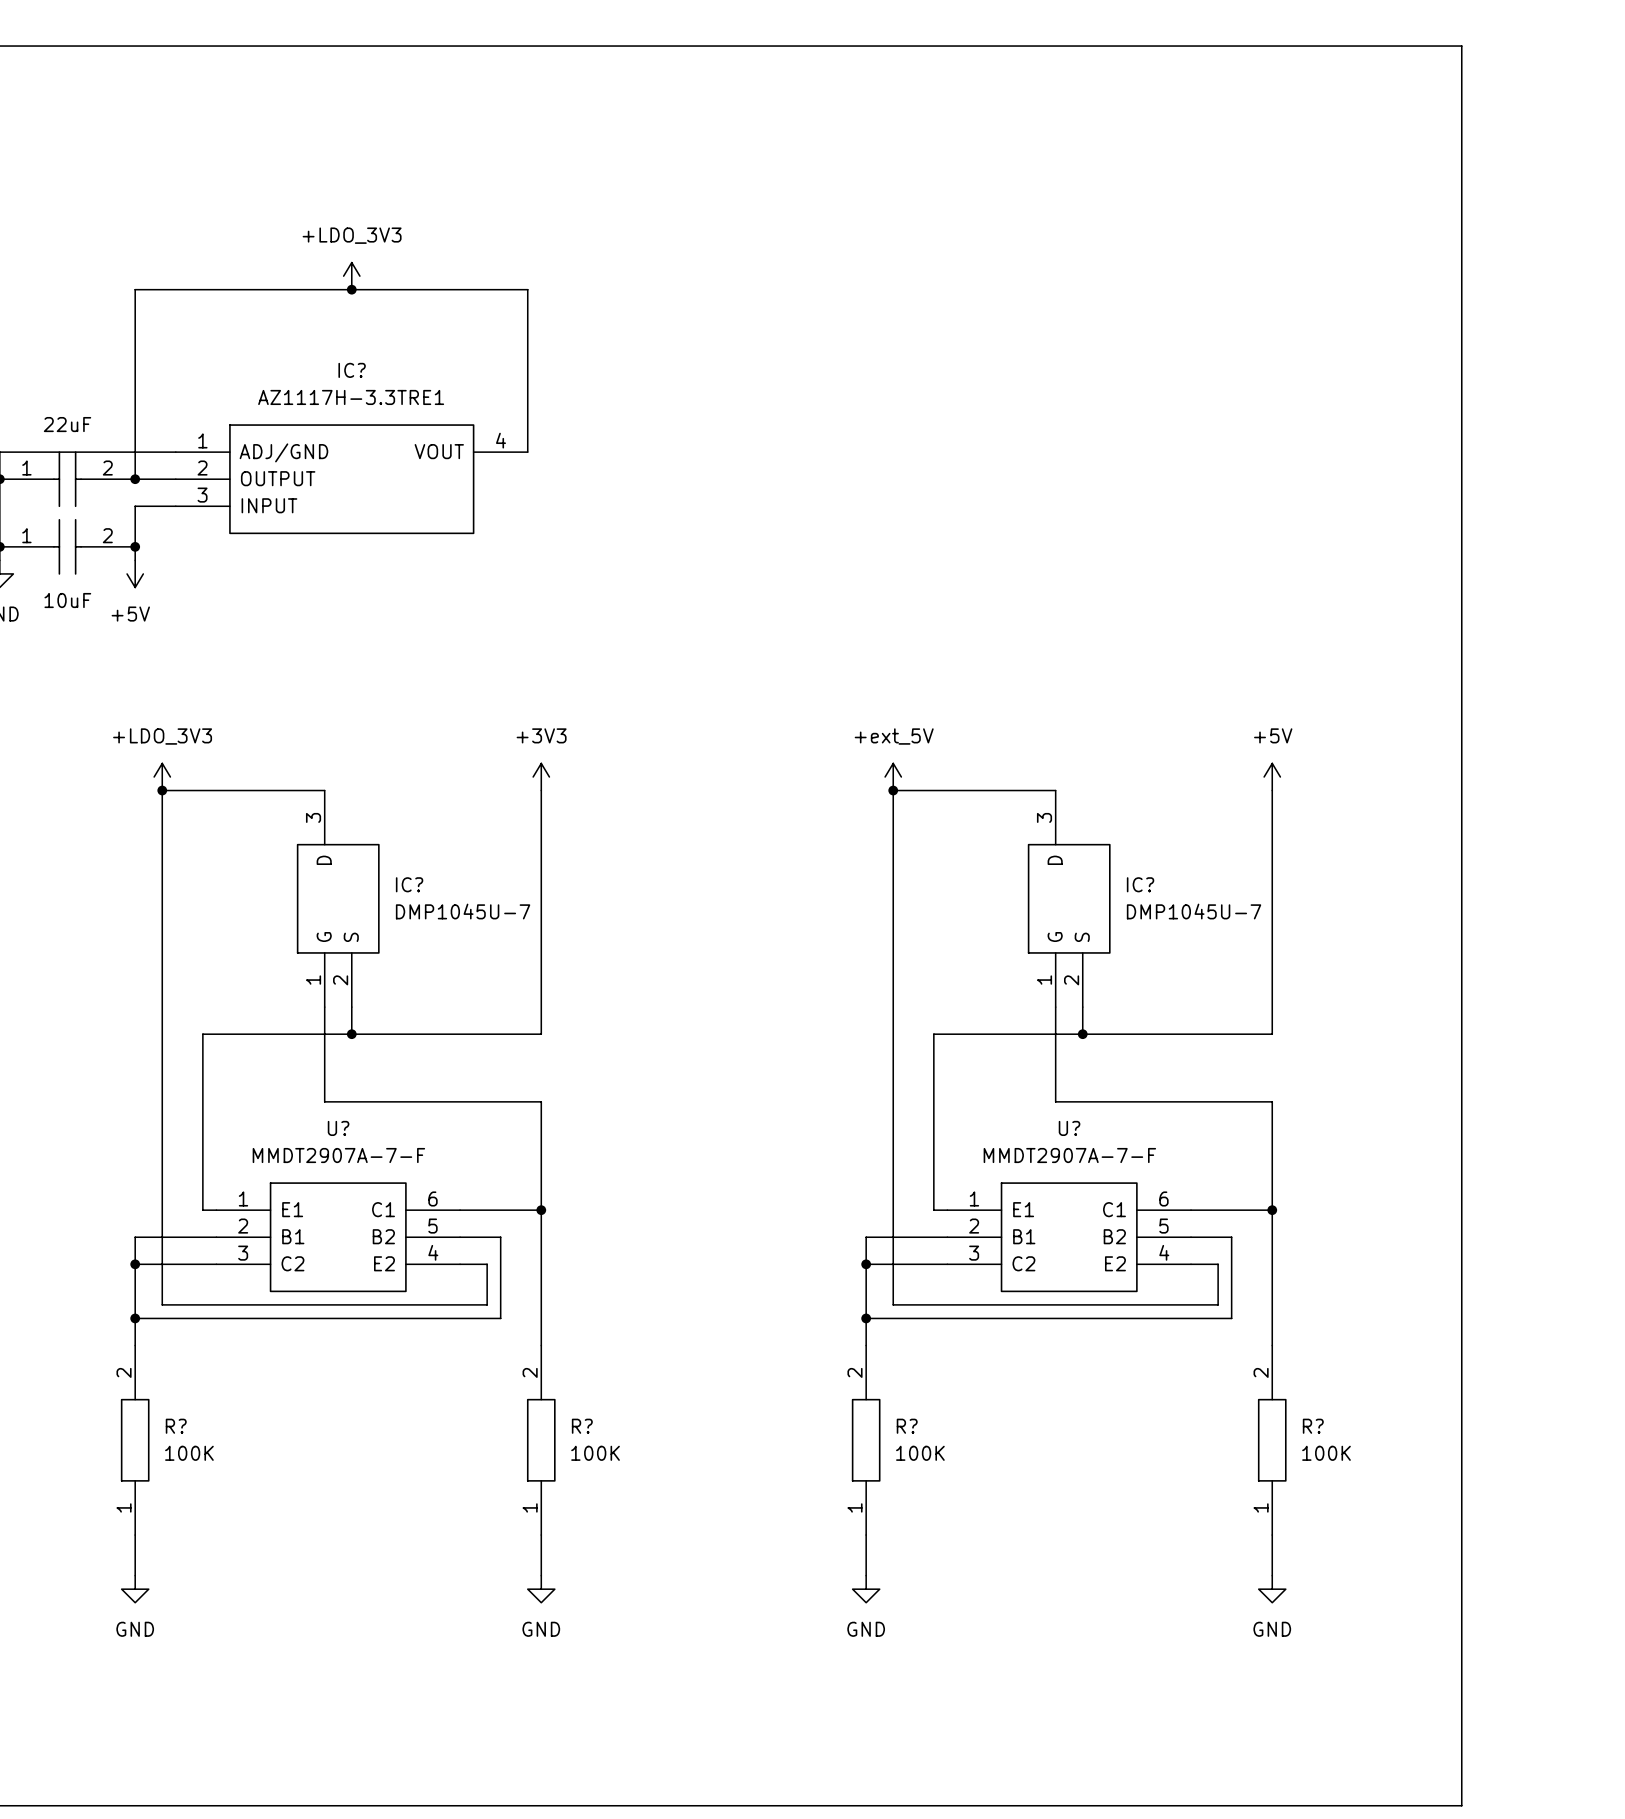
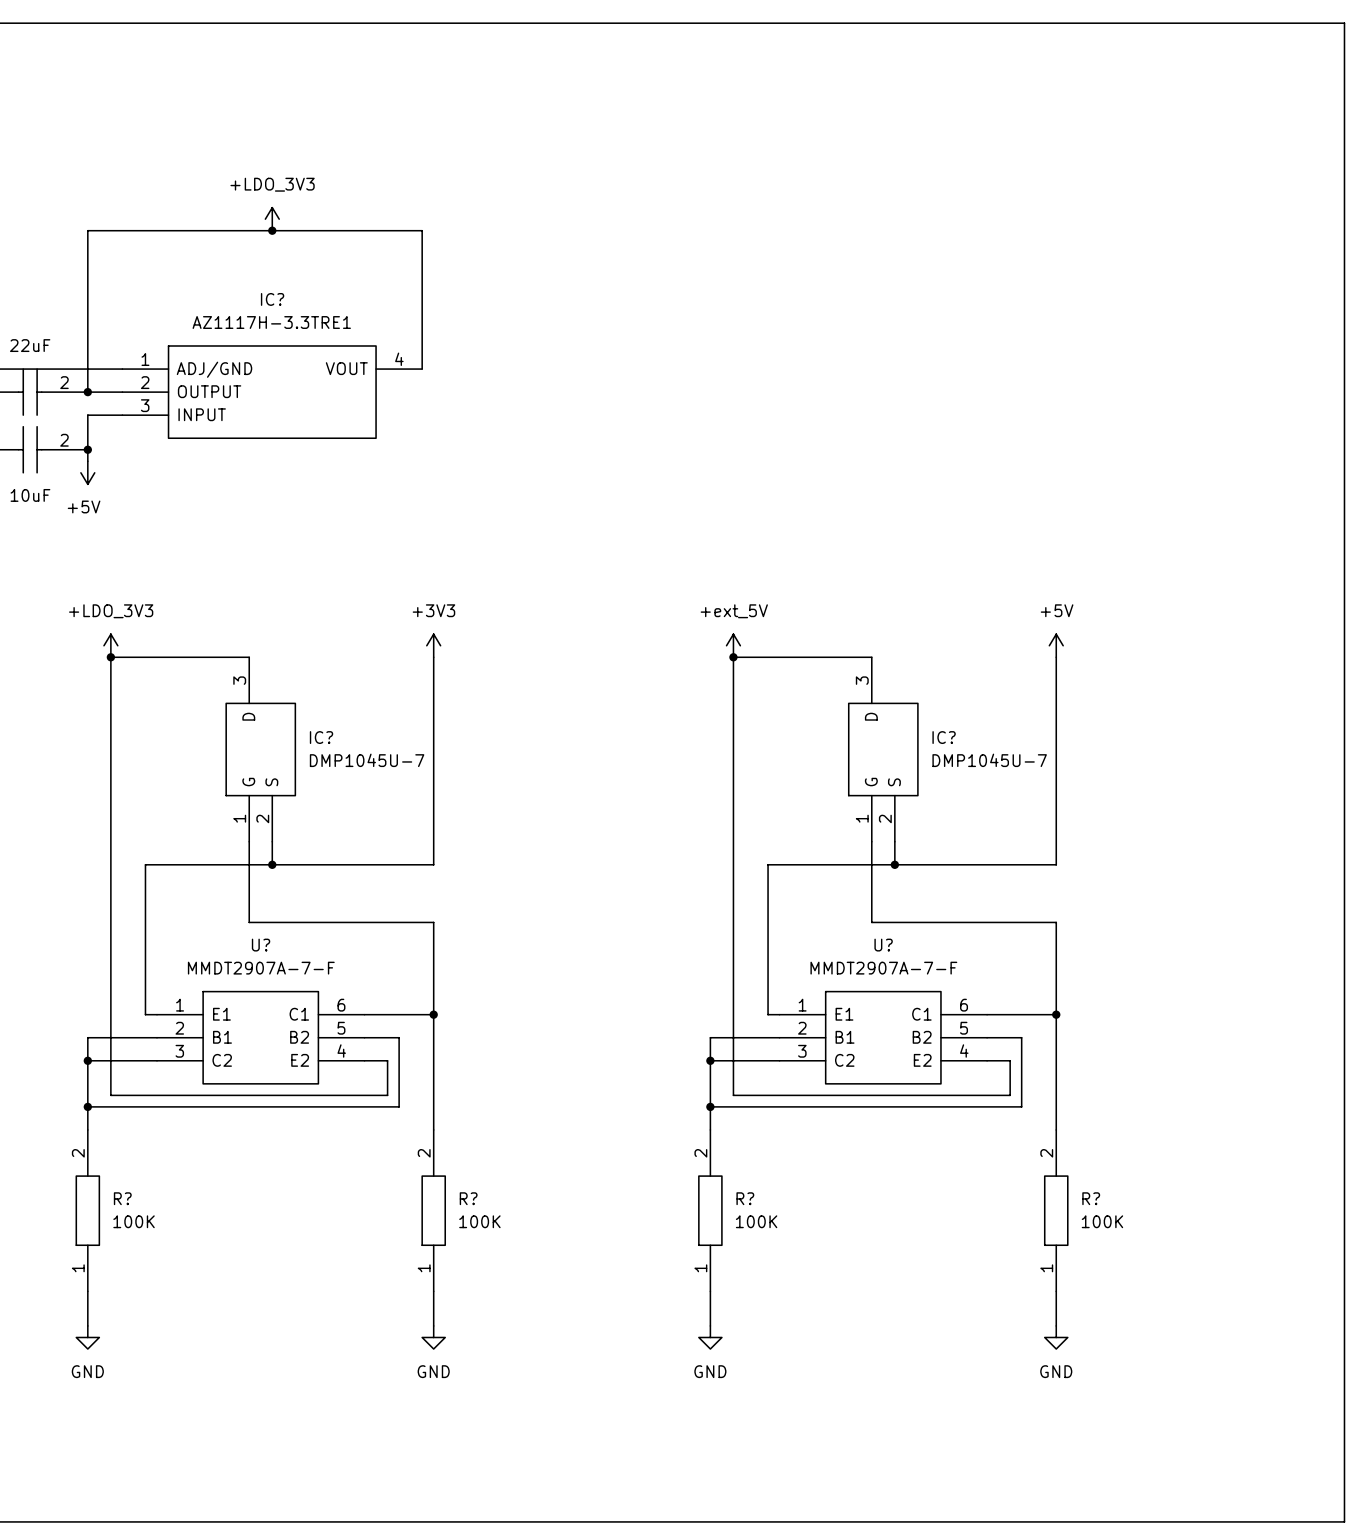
line: (1461, 46) (1461, 1805) -> (1217, 23) (1344, 23) (1344, 1521) (1217, 1521)

